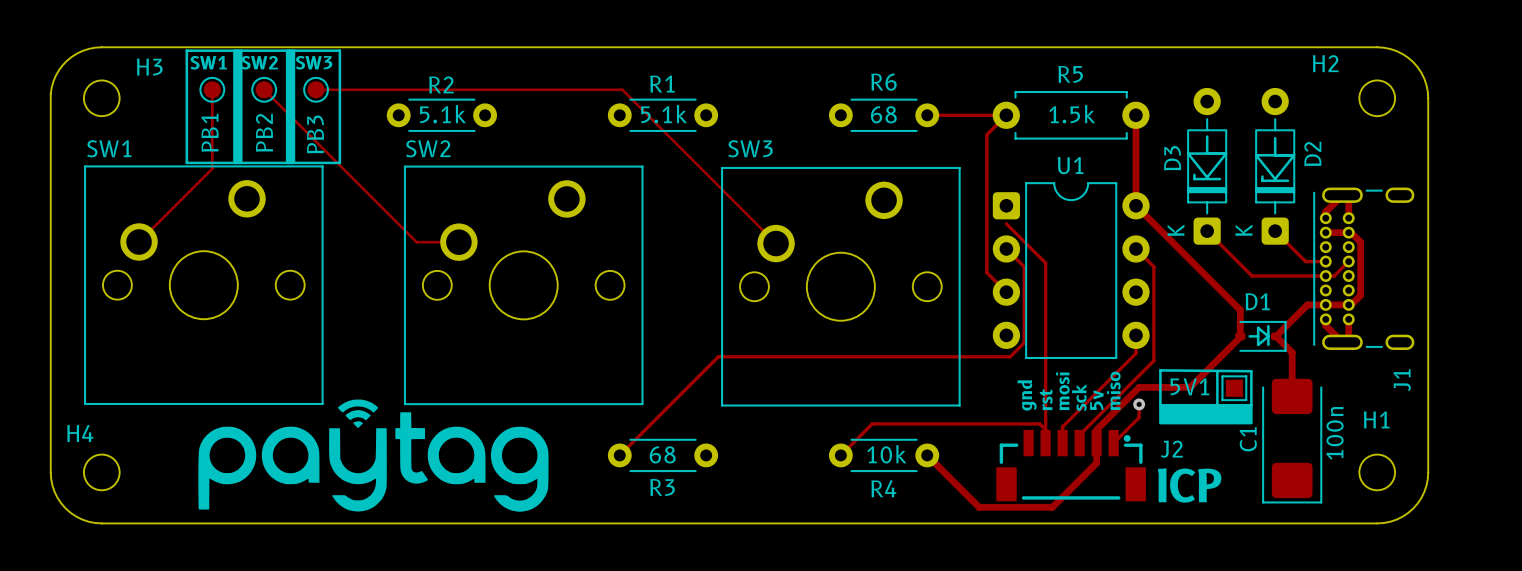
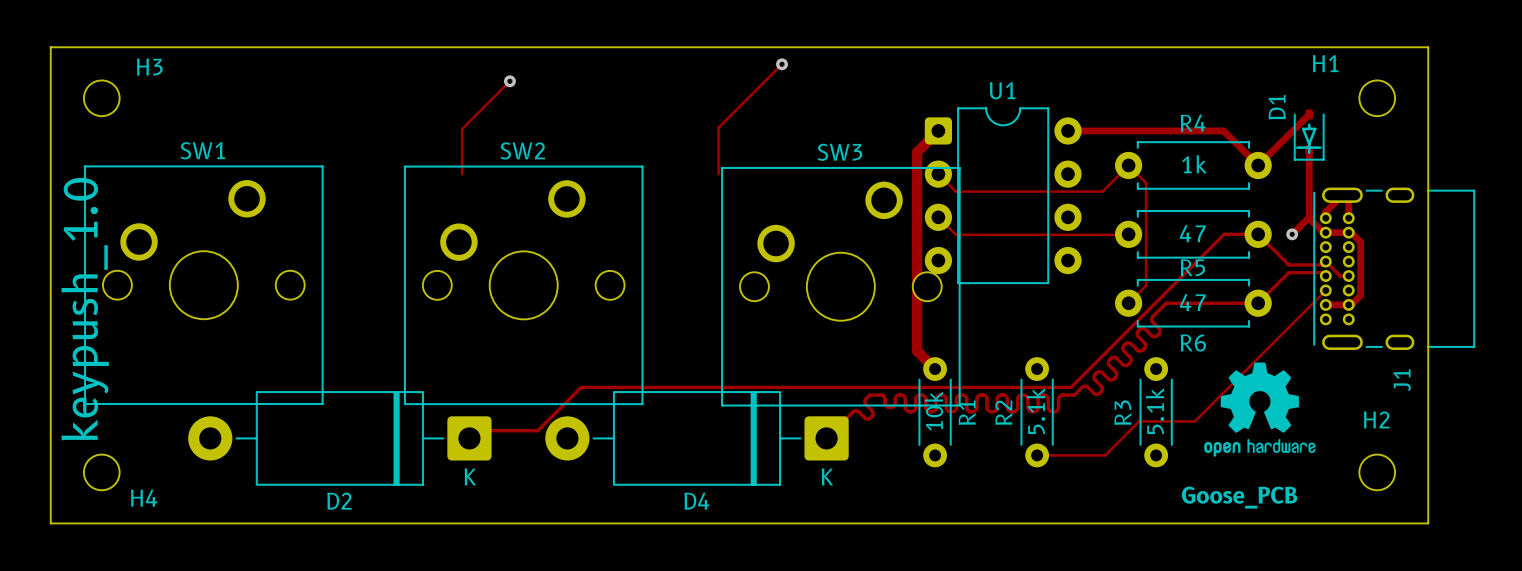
board edge: (101, 47) (83, 50) (67, 60) (55, 75) (50, 93) -> (101, 47) (50, 47) (50, 93)
board edge: (1377, 47) (1396, 51) (1413, 62) (1424, 78) (1428, 98) -> (1377, 47) (1428, 47) (1428, 98)
drawing: [233, 49, 243, 165] -> none
drawing: [285, 49, 296, 165] -> none
line: (186, 50) (339, 50) (339, 162) (186, 162) (186, 50) -> none
text: SW1 (208, 62) -> none
text: SW2 (259, 62) -> none
text: SW3 (314, 62) -> none
H2 name: H2 (1325, 63) -> H1 (1325, 63)
track: none -> (782, 64) (718, 127) (718, 174)
via: none -> (782, 64)
R5 name position: R5 (1070, 74) -> R5 (1192, 267)
track: none -> (509, 81) (462, 129) (462, 174)
via: none -> (509, 81)
R6 name position: R6 (883, 82) -> R6 (1193, 343)
R2 name position: R2 (441, 84) -> R2 (1003, 412)
D2 footprint: [1255, 87, 1296, 245] -> [188, 391, 492, 486]
track: (212, 89) (212, 168) (139, 242) -> none
PB1: (212, 89) -> none
track: (264, 89) (416, 242) (458, 242) -> none
PB2: (264, 89) -> none
track: (316, 89) (622, 89) (776, 243) -> none
PB3: (316, 89) -> none
R6 footprint: [828, 98, 940, 132] -> [1115, 278, 1272, 328]
R1 value: 5.1k (664, 114) -> 10k (933, 411)
R6 value: 68 (883, 114) -> 47 (1192, 302)
R5 value: 1.5k (1072, 114) -> 47 (1192, 233)
track: none -> (1309, 114) (1258, 165) (1223, 130) (1067, 130)
R2 rotation: 0° (441, 115) -> 90° clockwise (1037, 412)
R2 position: (441, 115) -> (1037, 412)
R1 rotation: 0° (662, 115) -> 90° clockwise (935, 412)
R1 position: (662, 115) -> (935, 412)
track: (927, 115) (1006, 115) (986, 134) (986, 272) (1006, 292) -> none
R5 position: (1071, 115) -> (1193, 234)
track: (1136, 115) (1136, 205) (1240, 310) (1240, 337) (1190, 387) (1139, 387) (1096, 429) (1096, 463) (1052, 507) (979, 507) (927, 455) -> none
line: none -> (1309, 124) (1309, 128)
track: none -> (938, 130) (917, 152) (917, 351) (935, 369)
line: (1207, 136) (1207, 153) -> none
line: (1275, 138) (1275, 155) -> none
line: none -> (1309, 144) (1315, 128) (1303, 128) (1309, 144)
line: none -> (1309, 144) (1309, 152)
line: none -> (1297, 147) (1320, 147)
SW1 name position: SW1 (109, 148) -> SW1 (202, 150)
SW2 name position: SW2 (428, 148) -> SW2 (522, 150)
SW3 name position: SW3 (750, 148) -> SW3 (839, 152)
track: none -> (1309, 150) (1309, 218) (1323, 232) (1325, 232)
line: (1224, 153) (1188, 153) (1207, 177) (1226, 153) -> none
D2 name position: D2 (1312, 153) -> D2 (339, 501)
line: (1292, 155) (1256, 155) (1275, 179) (1294, 155) -> none
D3: (1207, 166) -> none
track: none -> (938, 174) (955, 191) (1102, 191) (1128, 165) (1146, 182) (1146, 285) (1128, 303)
line: (1194, 174) (1194, 179) (1219, 179) -> none
line: (1262, 176) (1262, 180) (1287, 180) -> none
J1 footprint: [1313, 187, 1415, 350] -> [1313, 187, 1476, 350]
track: none -> (938, 217) (955, 234) (1128, 234)
track: none -> (1309, 217) (1292, 234)
track: (1006, 223) (1045, 263) (1045, 443) -> none
track: (1207, 231) (1252, 276) (1334, 276) (1348, 261) -> none
track: (1275, 231) (1305, 261) (1325, 261) -> none
via: none -> (1292, 234)
track: (1006, 248) (1024, 266) (1024, 342) (1010, 356) (718, 356) (619, 455) -> none
track: (1136, 248) (1153, 266) (1153, 360) (1079, 435) (1079, 443) -> none
U1 position: (1071, 270) -> (1003, 195)
track: none -> (1325, 276) (1322, 272) (1288, 272) (1258, 303) (1166, 303) (1151, 318) (1159, 329) (1158, 334) (1153, 336) (1144, 328) (1140, 328) (1137, 334) (1145, 343) (1144, 348) (1138, 351) (1130, 343) (1126, 343) (1122, 348) (1130, 358) (1128, 364) (1123, 365) (1114, 357) (1108, 361) (1108, 364) (1116, 373) (1114, 378) (1109, 379) (1100, 371) (1094, 374) (1094, 378) (1102, 388) (1099, 393) (1095, 394) (1085, 386) (1074, 395) (1060, 395) (1058, 398) (1058, 408) (1055, 411) (1048, 409) (1048, 397) (1044, 395) (1038, 397) (1037, 408) (1033, 411) (1028, 409) (1027, 397) (1024, 395) (1018, 397) (1017, 408) (1013, 411) (1008, 409) (1007, 398) (1004, 395) (997, 397) (997, 408) (993, 411) (987, 409) (986, 398) (984, 395) (977, 396) (976, 409) (970, 411) (966, 408) (966, 397) (959, 395) (956, 398) (956, 409) (950, 411) (946, 408) (945, 397) (939, 395) (936, 398) (935, 409) (929, 411) (926, 408) (925, 397) (919, 395) (915, 397) (914, 409) (909, 411) (905, 408) (905, 398) (903, 395) (896, 396) (894, 405) (889, 407) (885, 405) (883, 395) (869, 395) (864, 401) (872, 412) (870, 417) (865, 418) (857, 411) (854, 411) (826, 438)
track: none -> (1348, 276) (1340, 276) (1325, 261) (1322, 264) (1288, 264) (1258, 234) (1224, 234) (1071, 387) (581, 387) (537, 430) (477, 430) (469, 438)
track: none -> (1325, 290) (1194, 421) (1139, 421) (1105, 455) (1037, 455)
track: (1325, 304) (1307, 304) (1276, 336) (1292, 352) (1292, 396) -> none
text: none -> keypush_1.0 (85, 309)
track: (1325, 319) (1325, 325) (1342, 342) (1348, 336) (1348, 319) -> none
line: (1268, 326) (1268, 344) -> none
line: (1258, 327) (1268, 336) (1258, 344) (1258, 327) -> none
track: (1136, 335) (1136, 353) (1062, 426) (1062, 443) -> none
line: (1249, 336) (1258, 336) -> none
D1 rotation: 0° (1260, 336) -> 90° clockwise (1309, 135)
D1 position: (1260, 336) -> (1309, 135)
drawing: none -> [1204, 362, 1316, 457]
line: (1160, 370) (1251, 371) (1251, 405) (1160, 405) (1160, 370) -> none
line: (1217, 371) (1217, 405) -> none
5V1: (1234, 388) -> none
text: miso (1113, 390) -> none
text: mosi (1062, 391) -> none
text: gnd (1027, 395) -> none
text: sck (1079, 397) -> none
drawing: [198, 399, 549, 512] -> none
text: rst (1046, 399) -> none
text: 5v (1096, 400) -> none
drawing: [1159, 403, 1253, 425] -> none
track: (1139, 404) (1139, 417) (1113, 443) -> none
via: (1139, 404) -> none
H1 name: H1 (1376, 419) -> H2 (1376, 419)
track: (1045, 429) (1039, 423) (872, 423) (840, 455) -> none
H4 name position: H4 (80, 433) -> H4 (144, 498)
D4: none -> (696, 438)
R4 footprint: [828, 438, 940, 473] -> [1115, 141, 1272, 190]
C1: 100n (1292, 441) -> none
R3 value: 68 (662, 454) -> 5.1k (1155, 411)
R4 value: 10k (886, 454) -> 1k (1194, 164)
R3 rotation: 0° (662, 455) -> 90° clockwise (1156, 412)
R3 position: (662, 455) -> (1156, 412)
J2: (1071, 465) -> none
board edge: (50, 472) (54, 491) (65, 508) (82, 519) (101, 523) -> (50, 472) (50, 523) (101, 523)
board edge: (1428, 472) (1424, 491) (1413, 508) (1396, 519) (1377, 523) -> (1428, 472) (1428, 523) (1377, 523)
text: ICP (1189, 485) -> none
R4 name position: R4 (883, 488) -> R4 (1193, 123)
text: none -> Goose_PCB (1239, 497)

